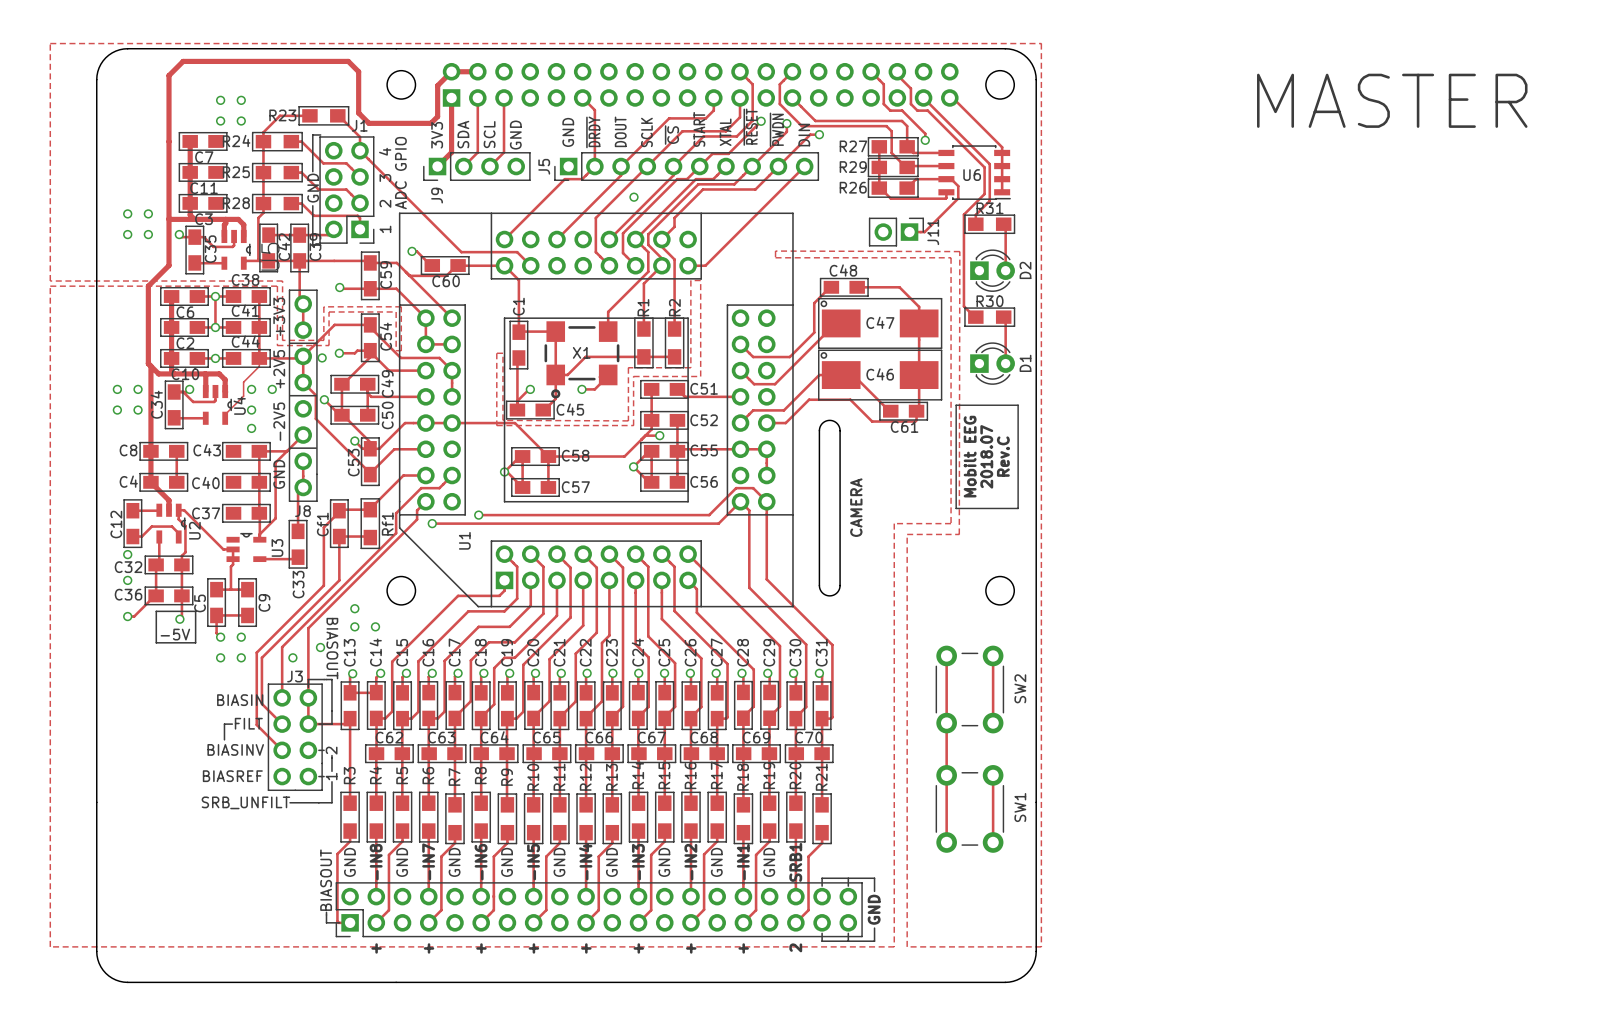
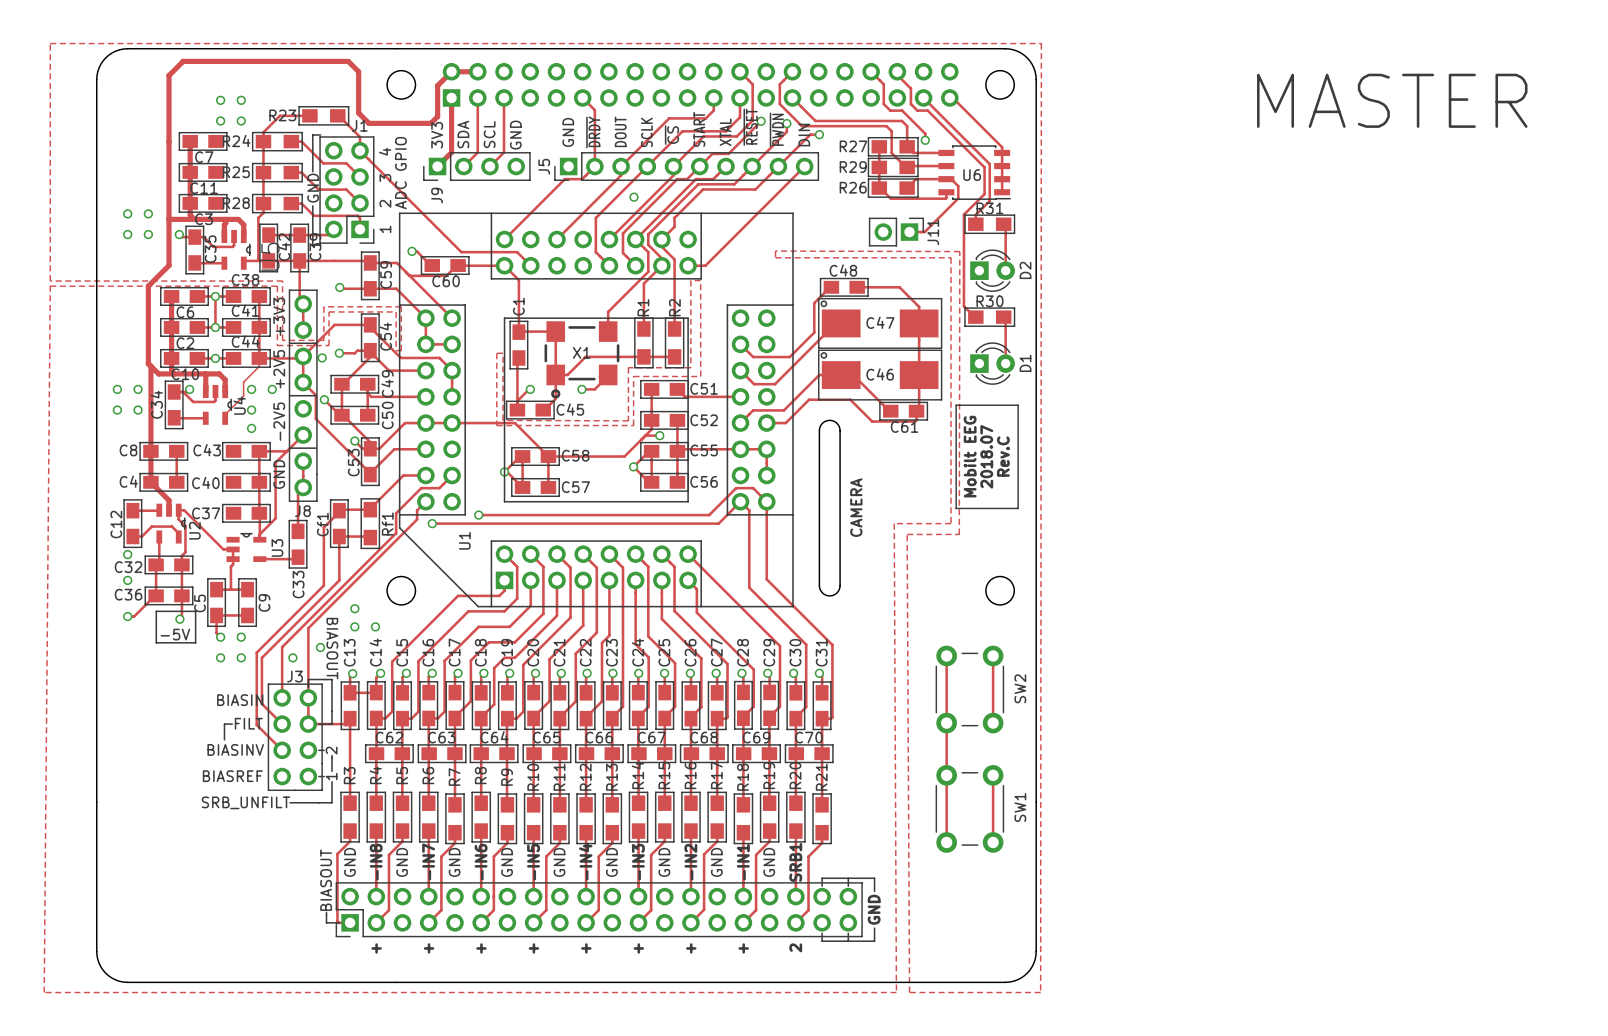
zone outline: (1041, 43) (1041, 946) (907, 946) (907, 534) -> (1041, 43) (1040, 992) (909, 992) (907, 534)
zone outline: (50, 286) (50, 946) (894, 946) (894, 523) -> (50, 286) (44, 992) (896, 992) (894, 523)

